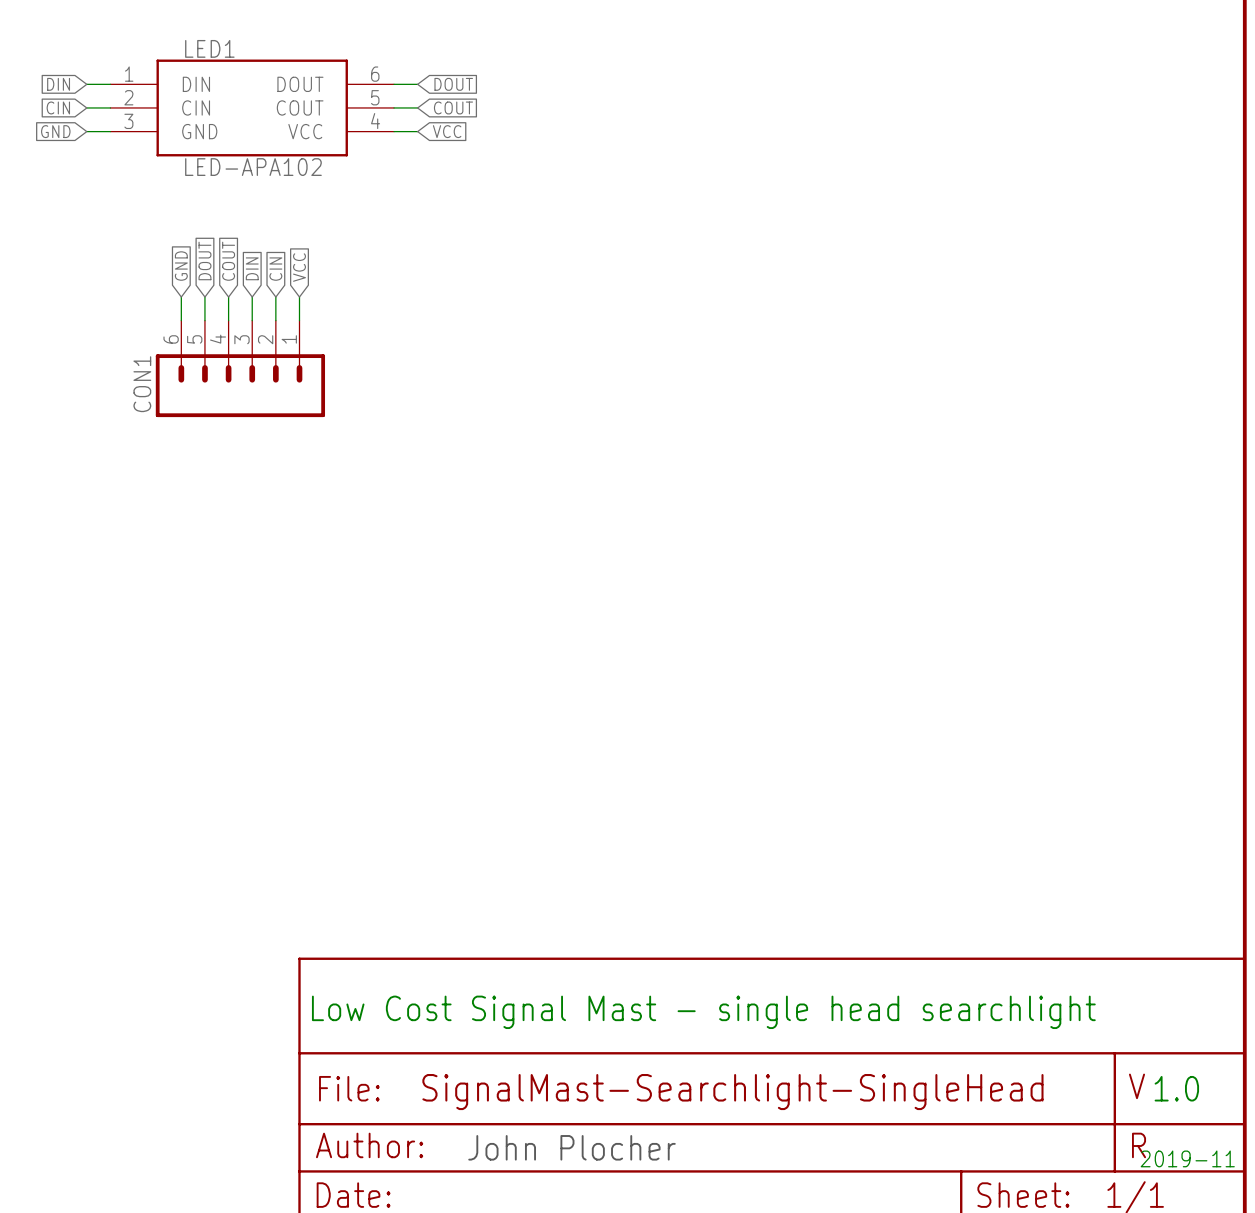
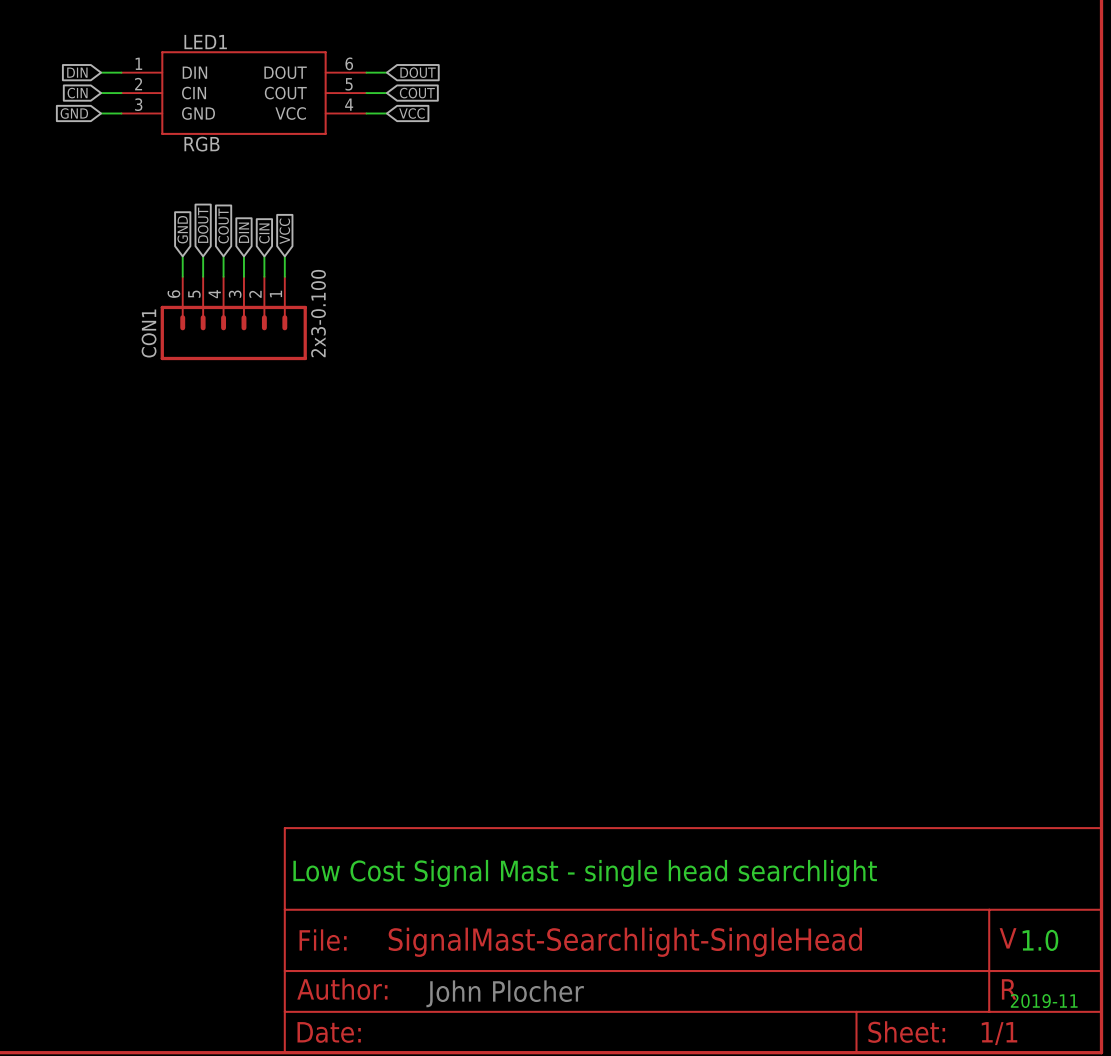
LED1 value: LED-APA102 (253, 167) -> RGB (201, 144)
CON1 value: none -> 2x3-0.100 (318, 313)

